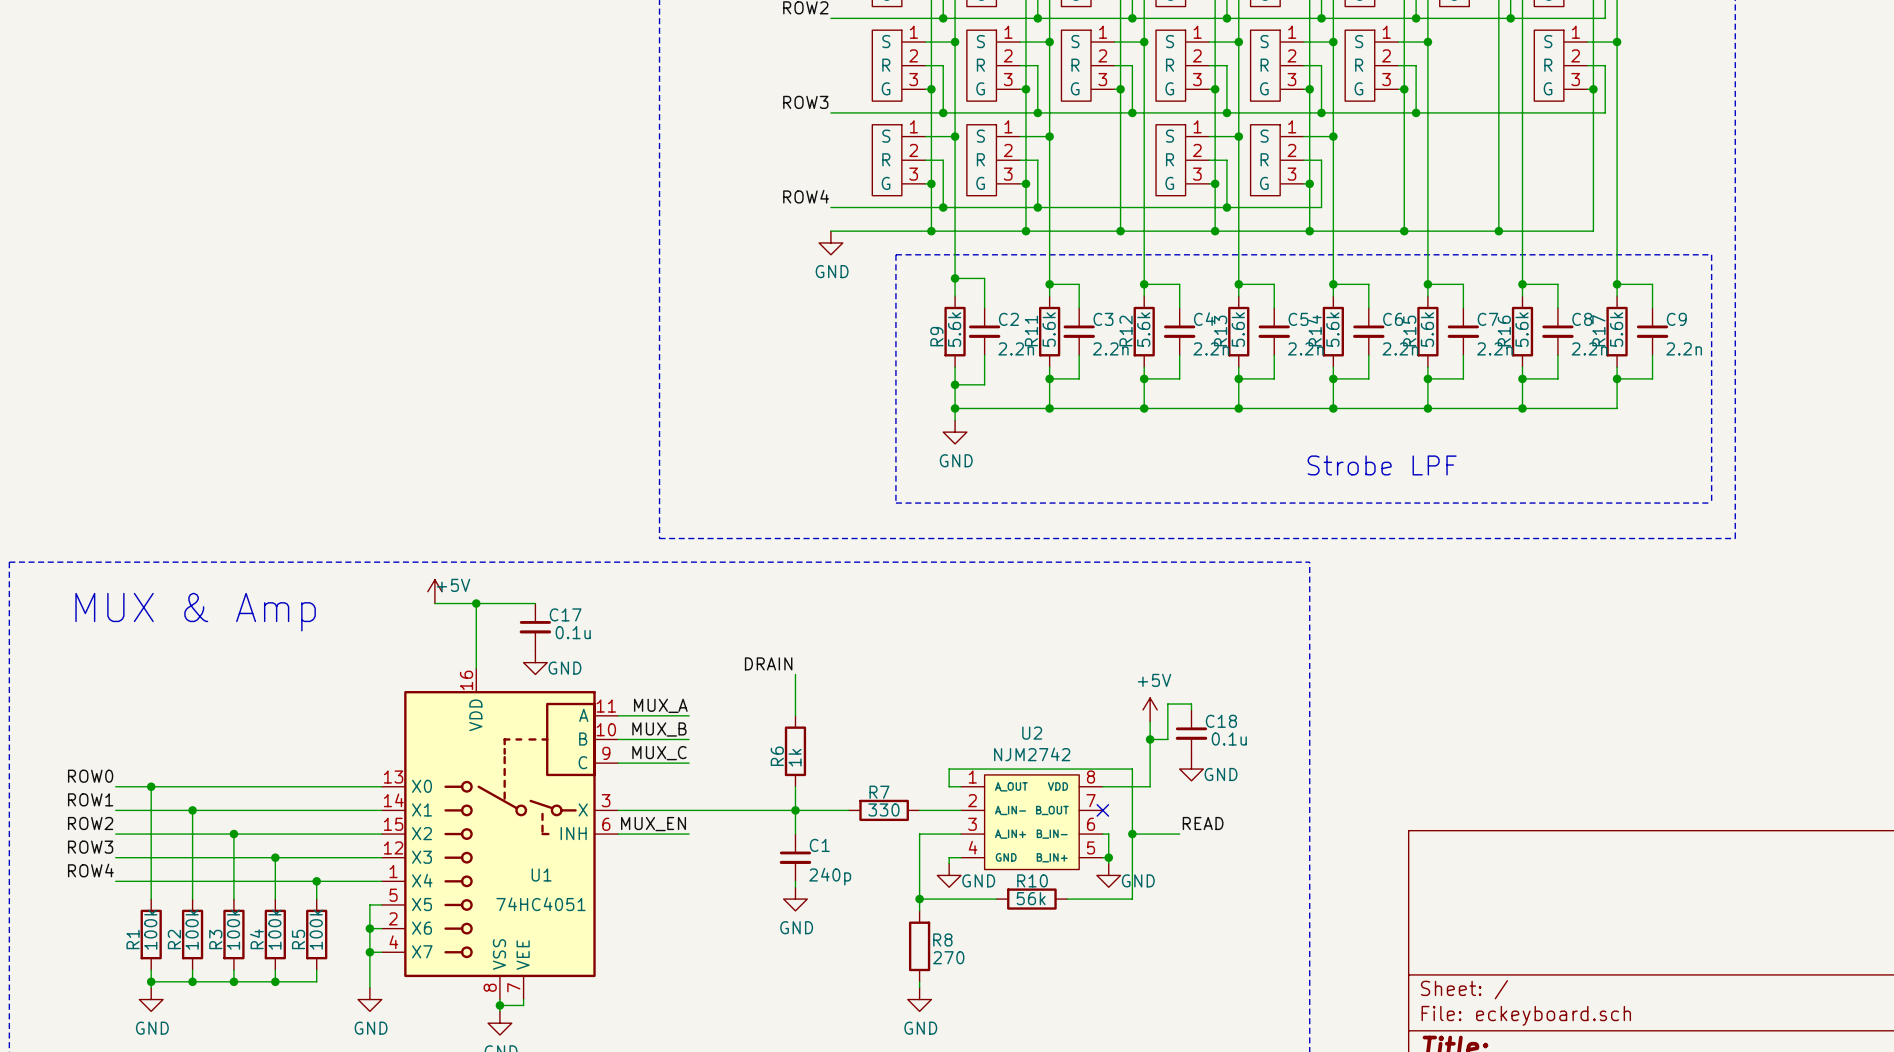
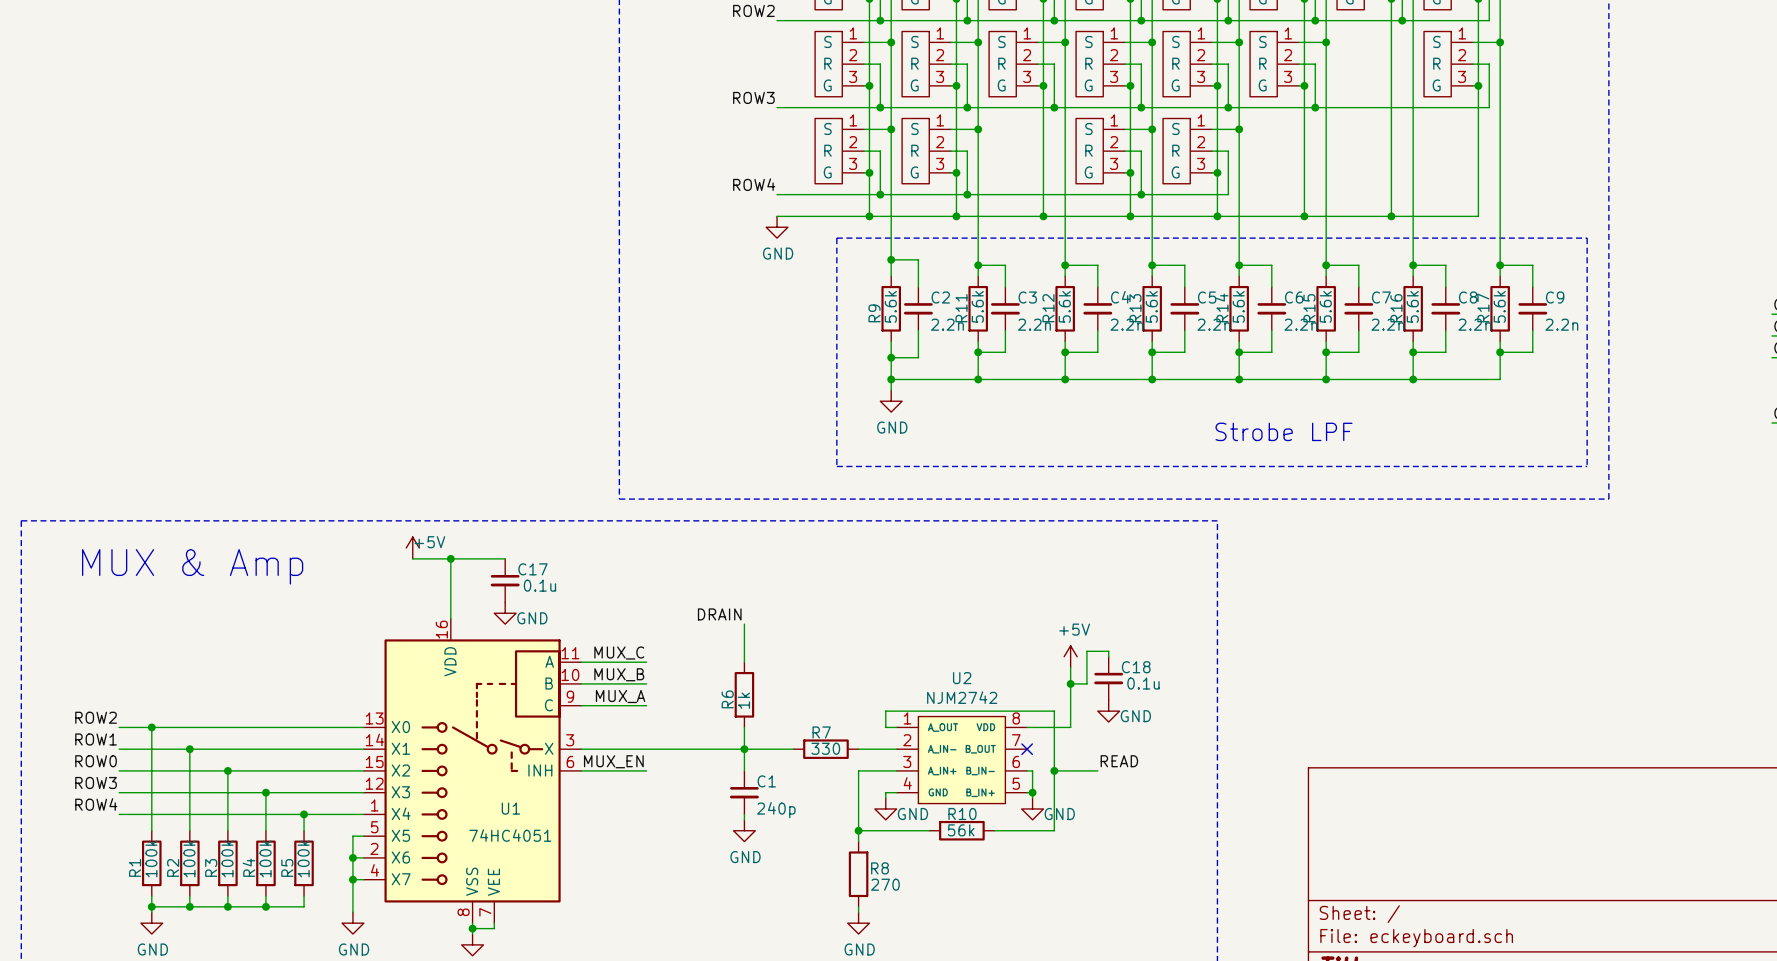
label: MUX_A (660, 705) -> MUX_C (619, 653)
label: MUX_C (659, 753) -> MUX_A (620, 696)
label: ROW0 (90, 776) -> ROW2 (96, 717)
label: ROW2 (90, 823) -> ROW0 (96, 761)

